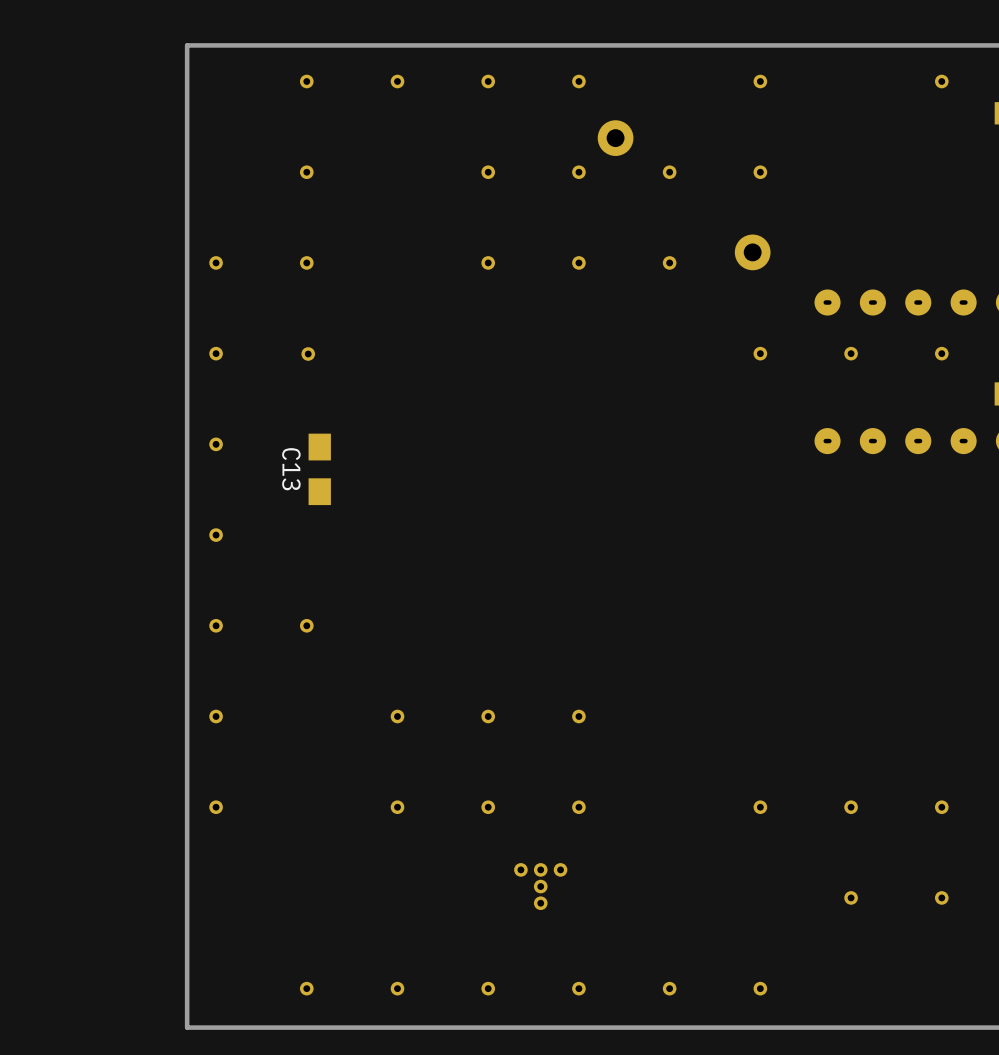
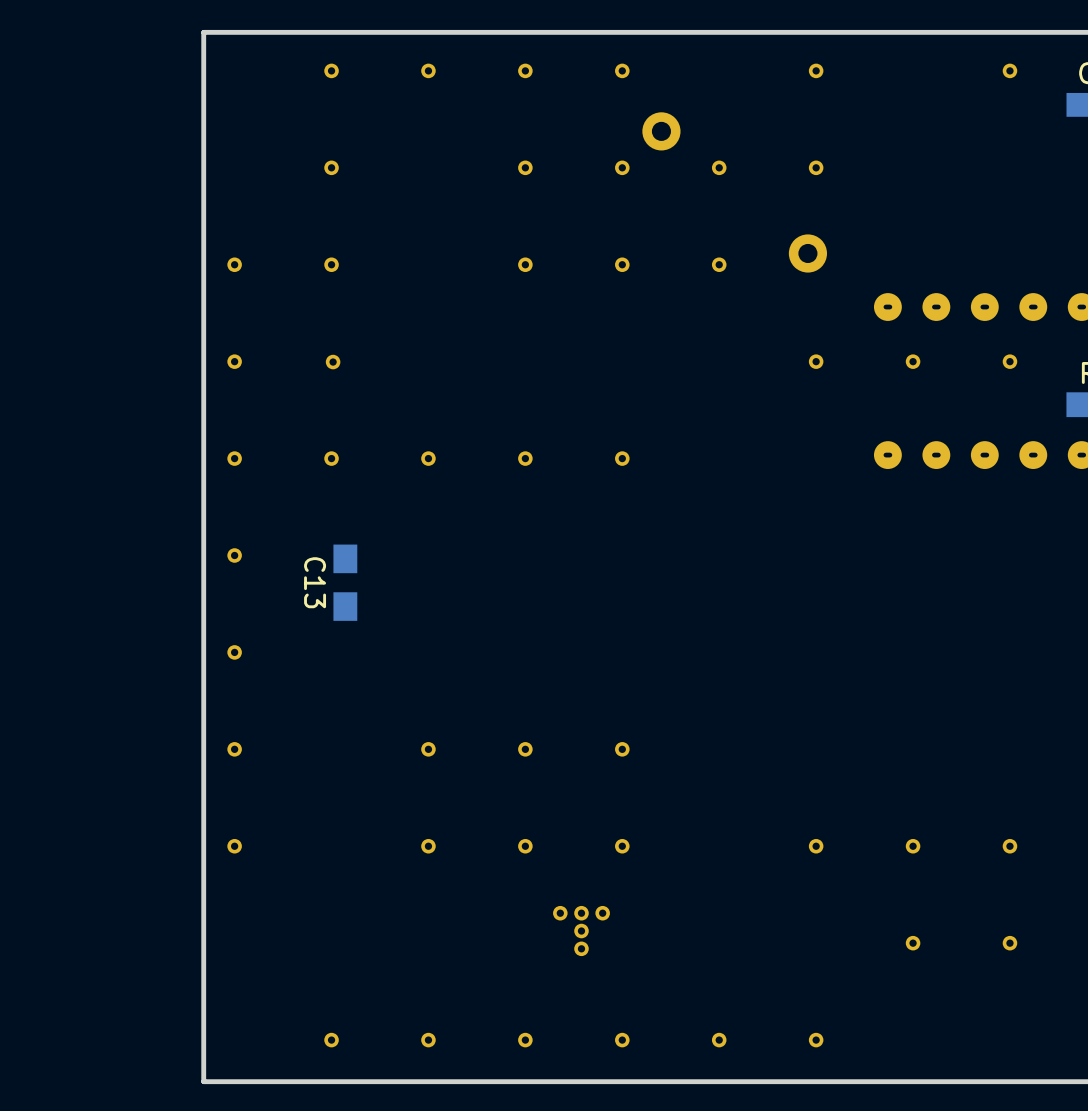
part: none -> (331, 458)
part: none -> (428, 458)
part: none -> (525, 458)
part: none -> (622, 458)
C13 position: (319, 469) -> (345, 582)
part: (306, 625) -> none

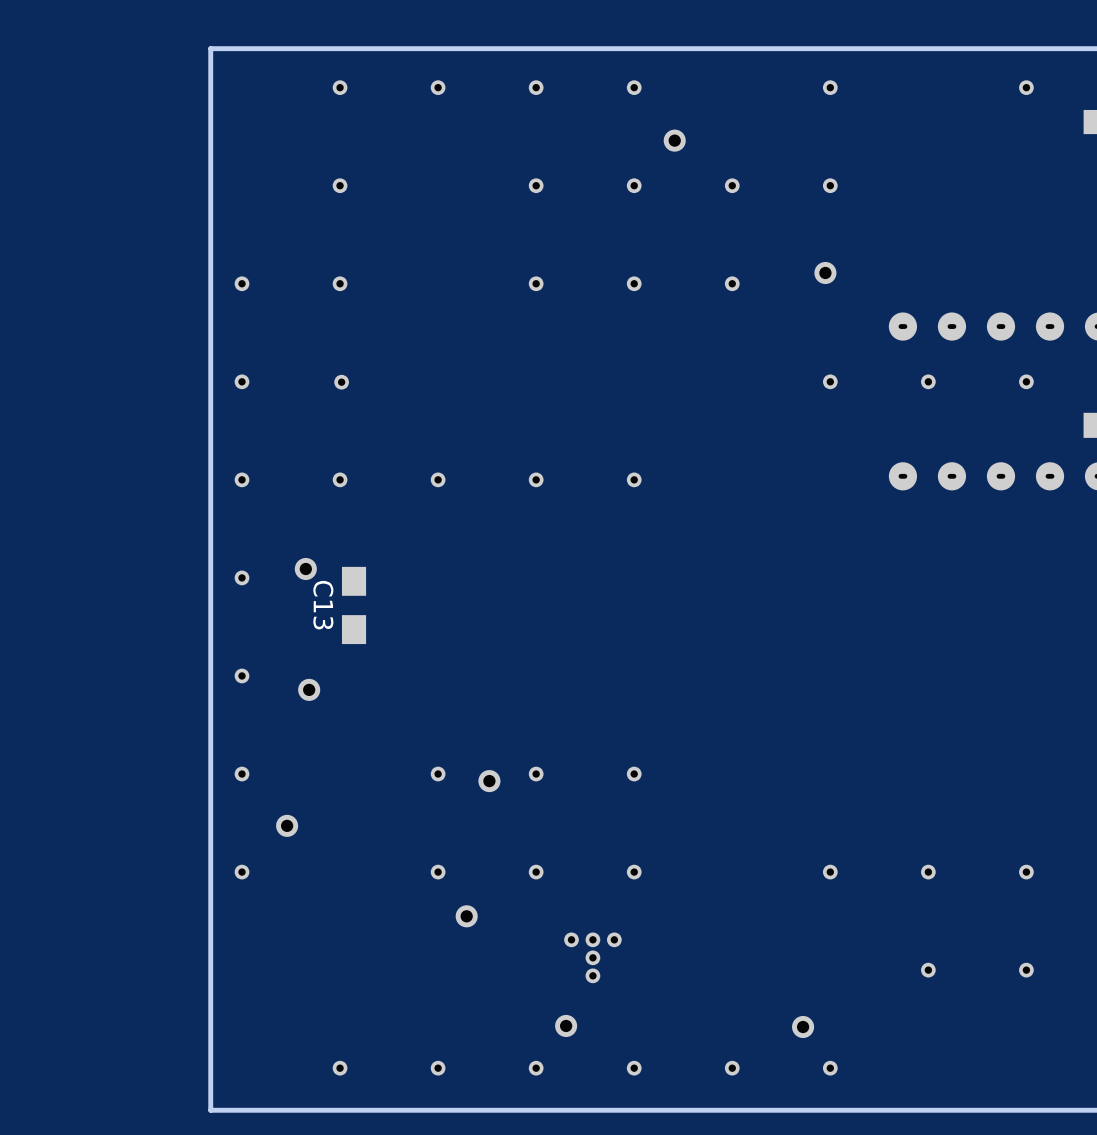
part footprint: [642, 112, 681, 151] -> [663, 129, 686, 152]
part footprint: [788, 234, 828, 273] -> [814, 261, 837, 285]
part: none -> (305, 569)
part: none -> (309, 689)
part: none -> (489, 781)
part: none -> (287, 825)
part: none -> (466, 916)
part: none -> (566, 1025)
part: none -> (803, 1026)

